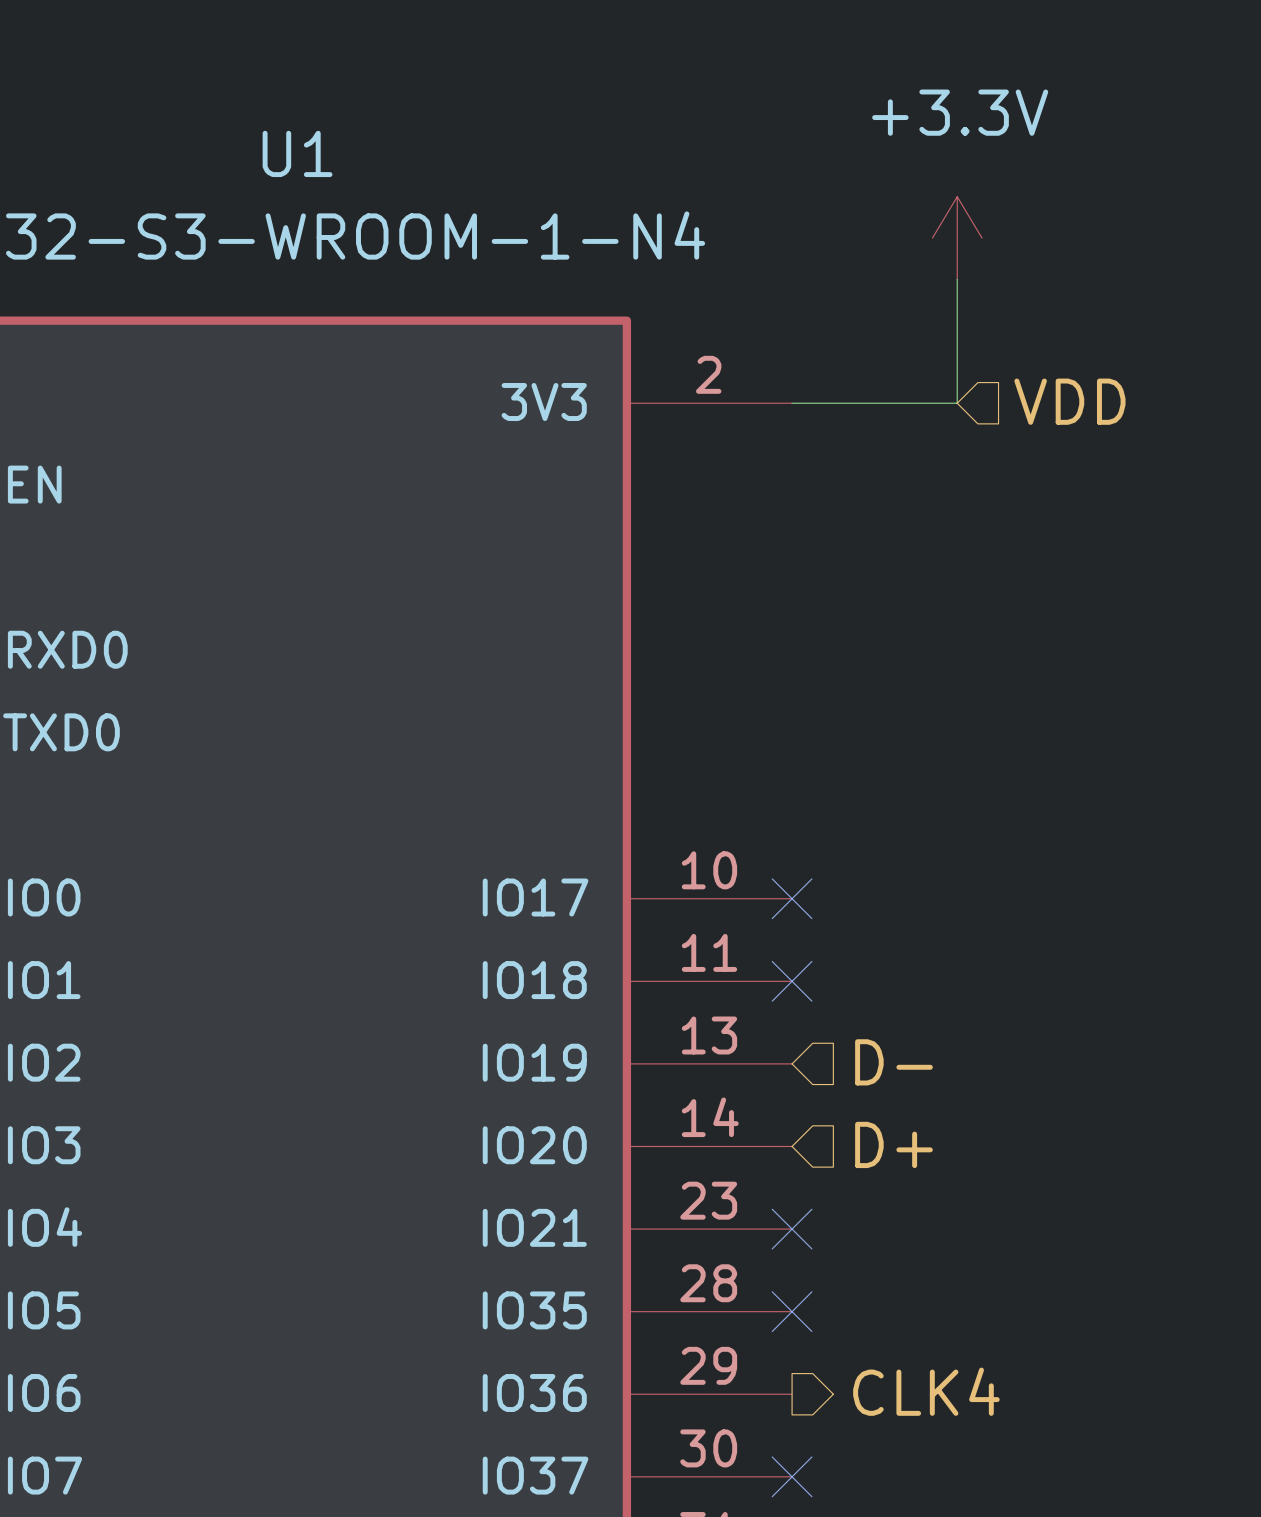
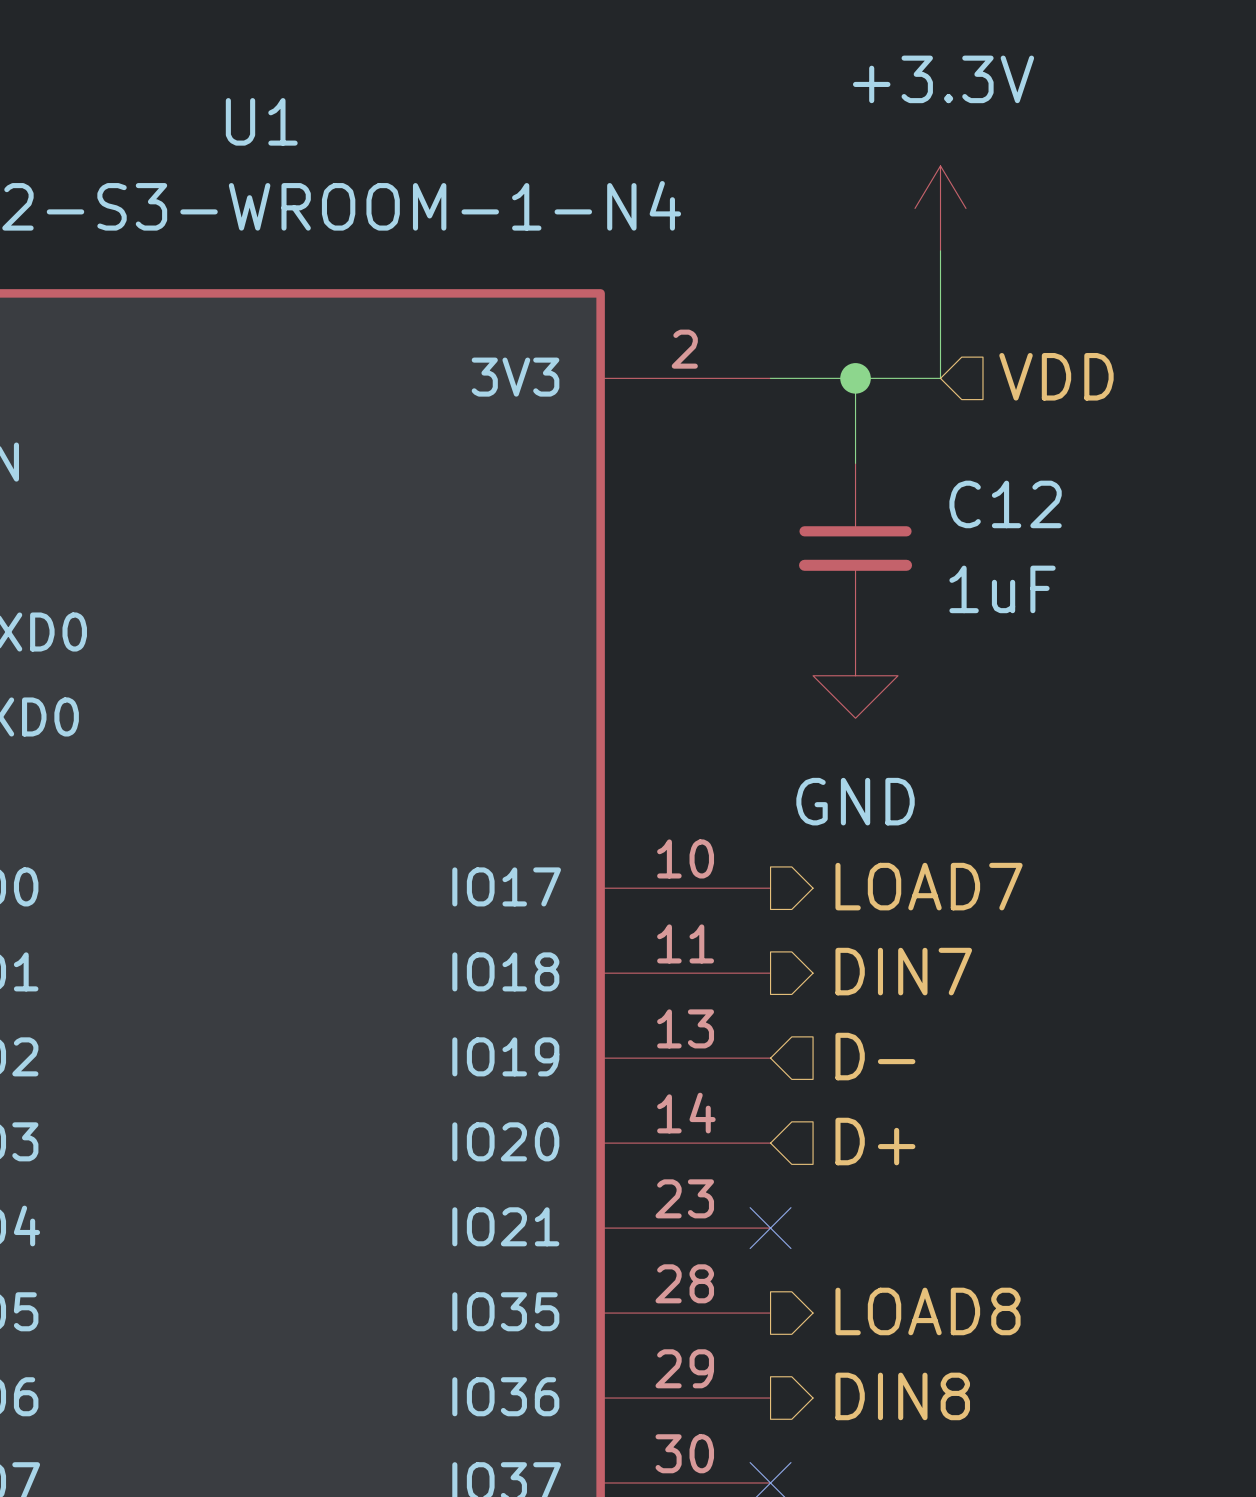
wire: none -> (855, 378) (855, 463)
junction: none -> (855, 378)
C12: none -> 1uF (855, 548)
power symbol: none -> GND (855, 675)
hierarchical label: none -> LOAD7 (929, 886)
no-connect mark: (792, 898) -> none
hierarchical label: none -> DIN7 (903, 971)
no-connect mark: (792, 981) -> none
hierarchical label: none -> LOAD8 (928, 1311)
no-connect mark: (792, 1311) -> none
hierarchical label: CLK4 (926, 1391) -> DIN8 (902, 1396)

